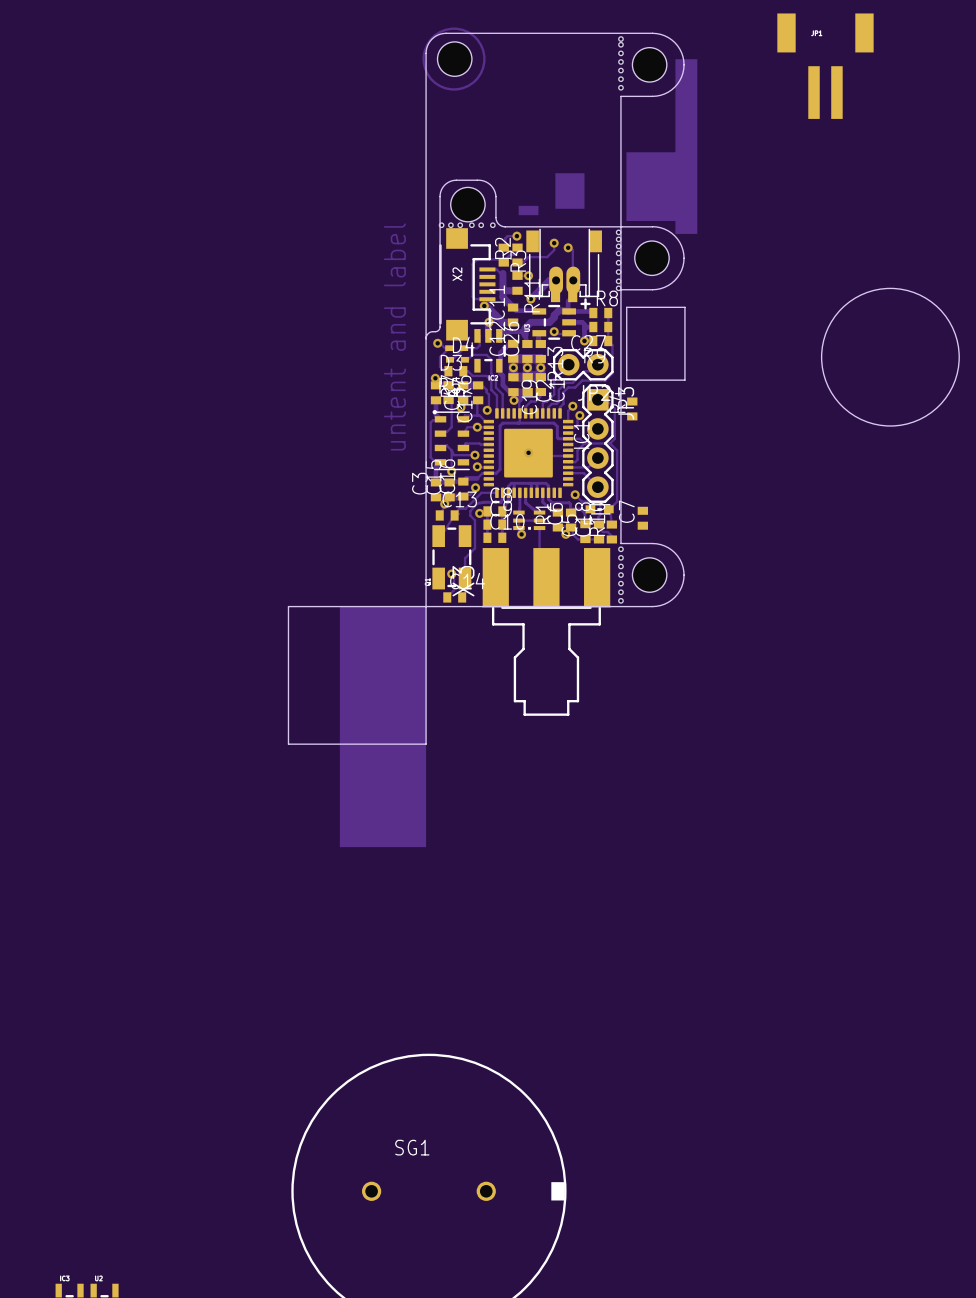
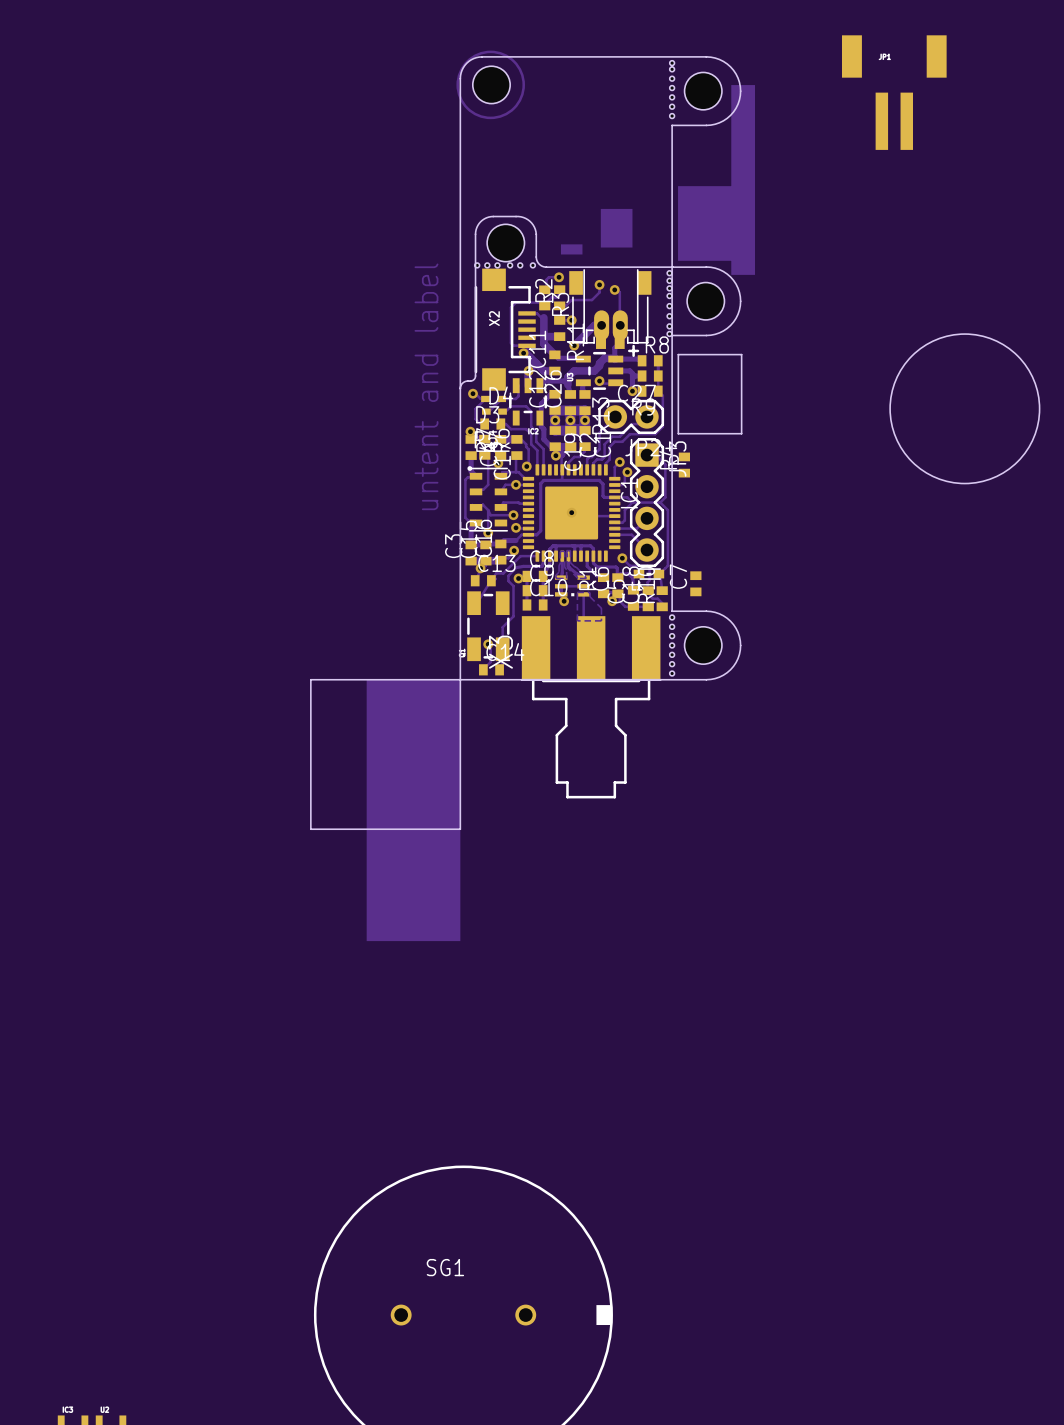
zone outline: none -> (566, 550) (570, 550) (570, 562) (586, 578) (578, 578) (567, 567) (566, 550)
zone outline: none -> (560, 551) (564, 551) (566, 578) (555, 577) (559, 572) (560, 551)
zone outline: none -> (577, 592) (590, 593) (590, 596) (601, 608) (601, 620) (577, 620) (577, 592)

